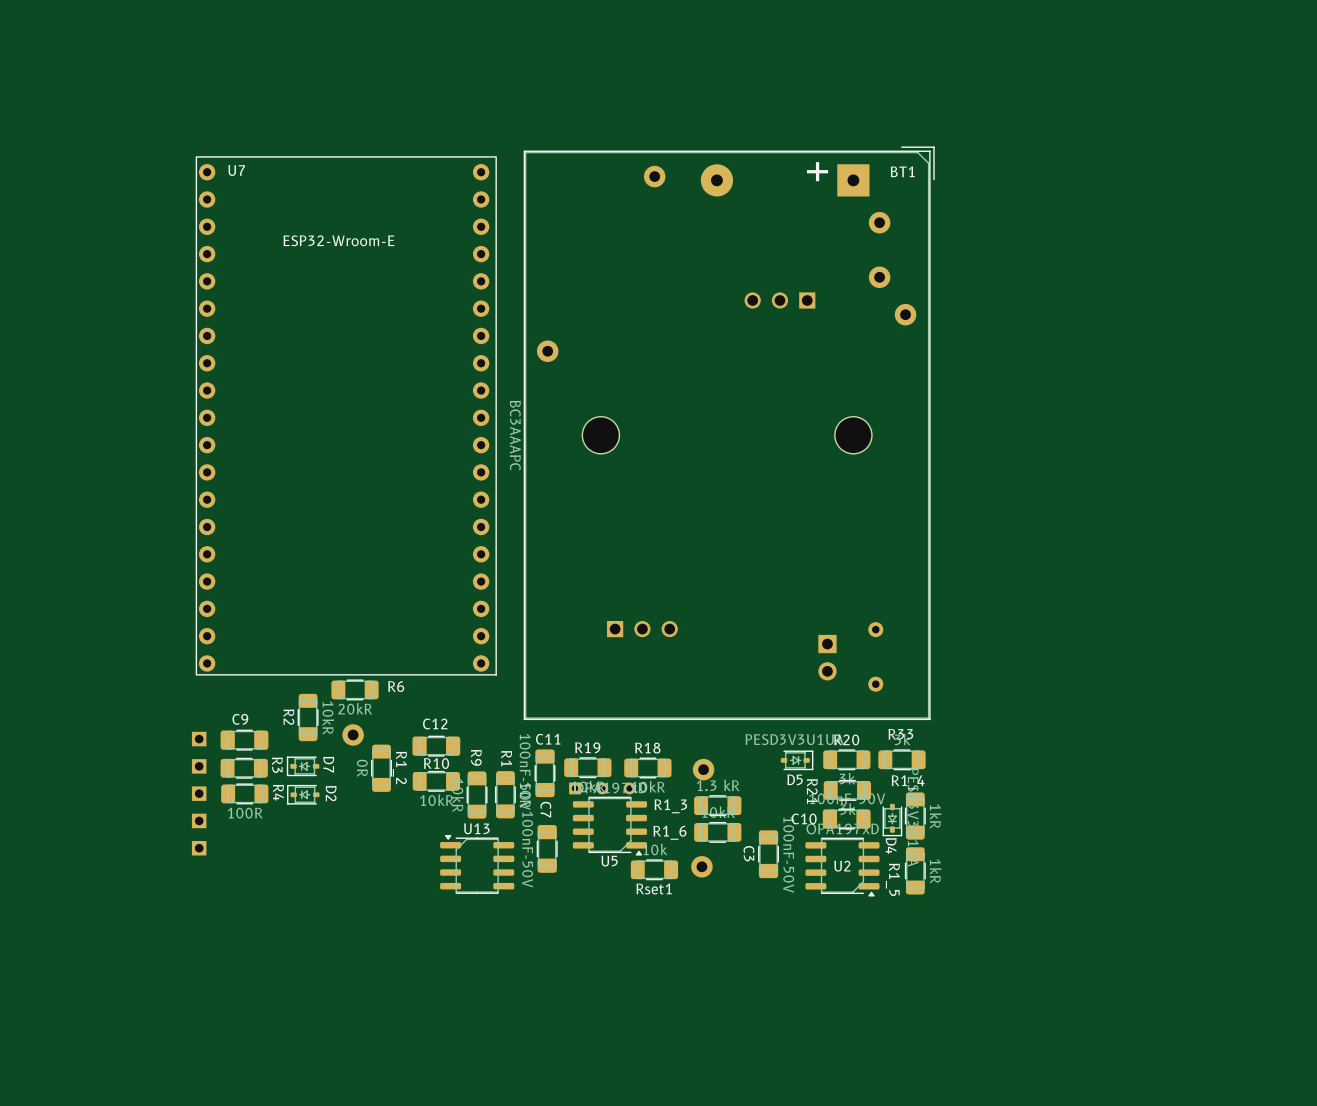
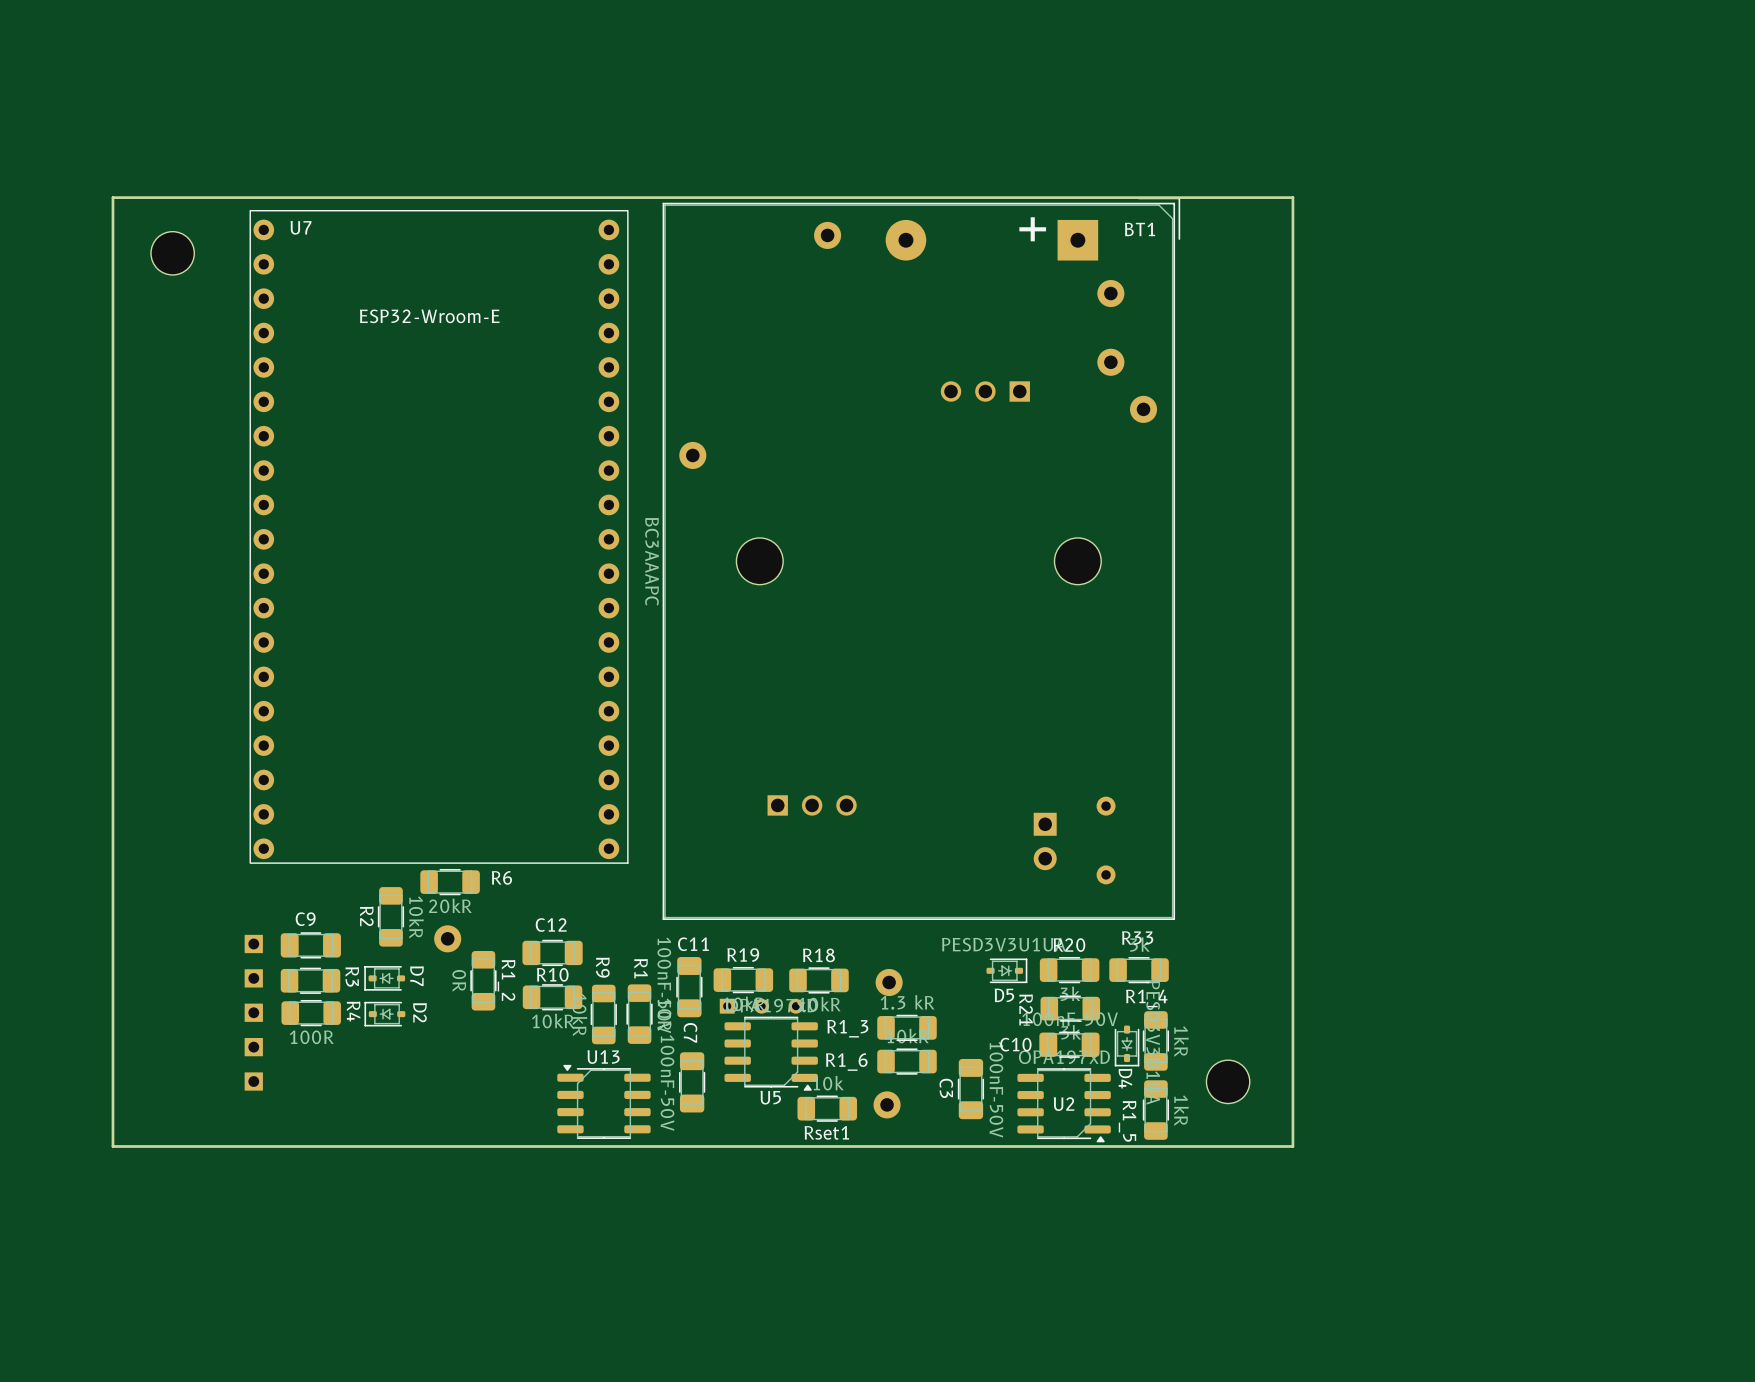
board edge: none -> (1292, 197) (112, 197) (112, 1146) (1292, 1146) (1292, 197)
part: none -> (172, 253)
part: none -> (1228, 1081)

